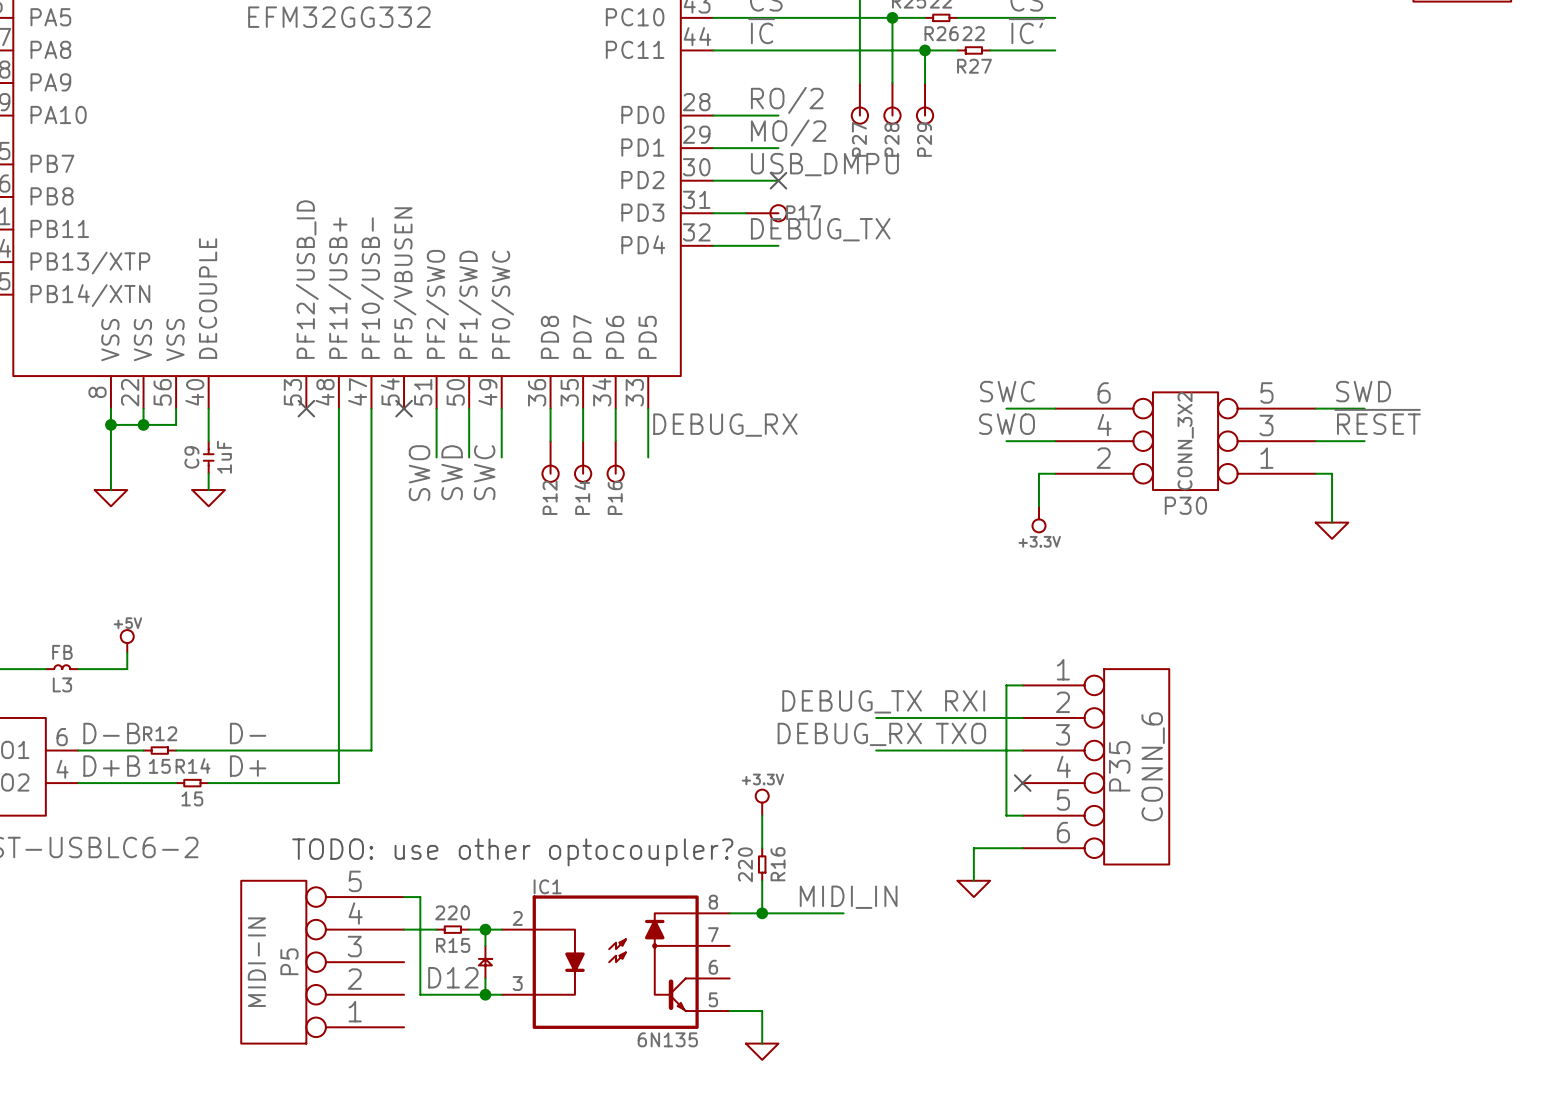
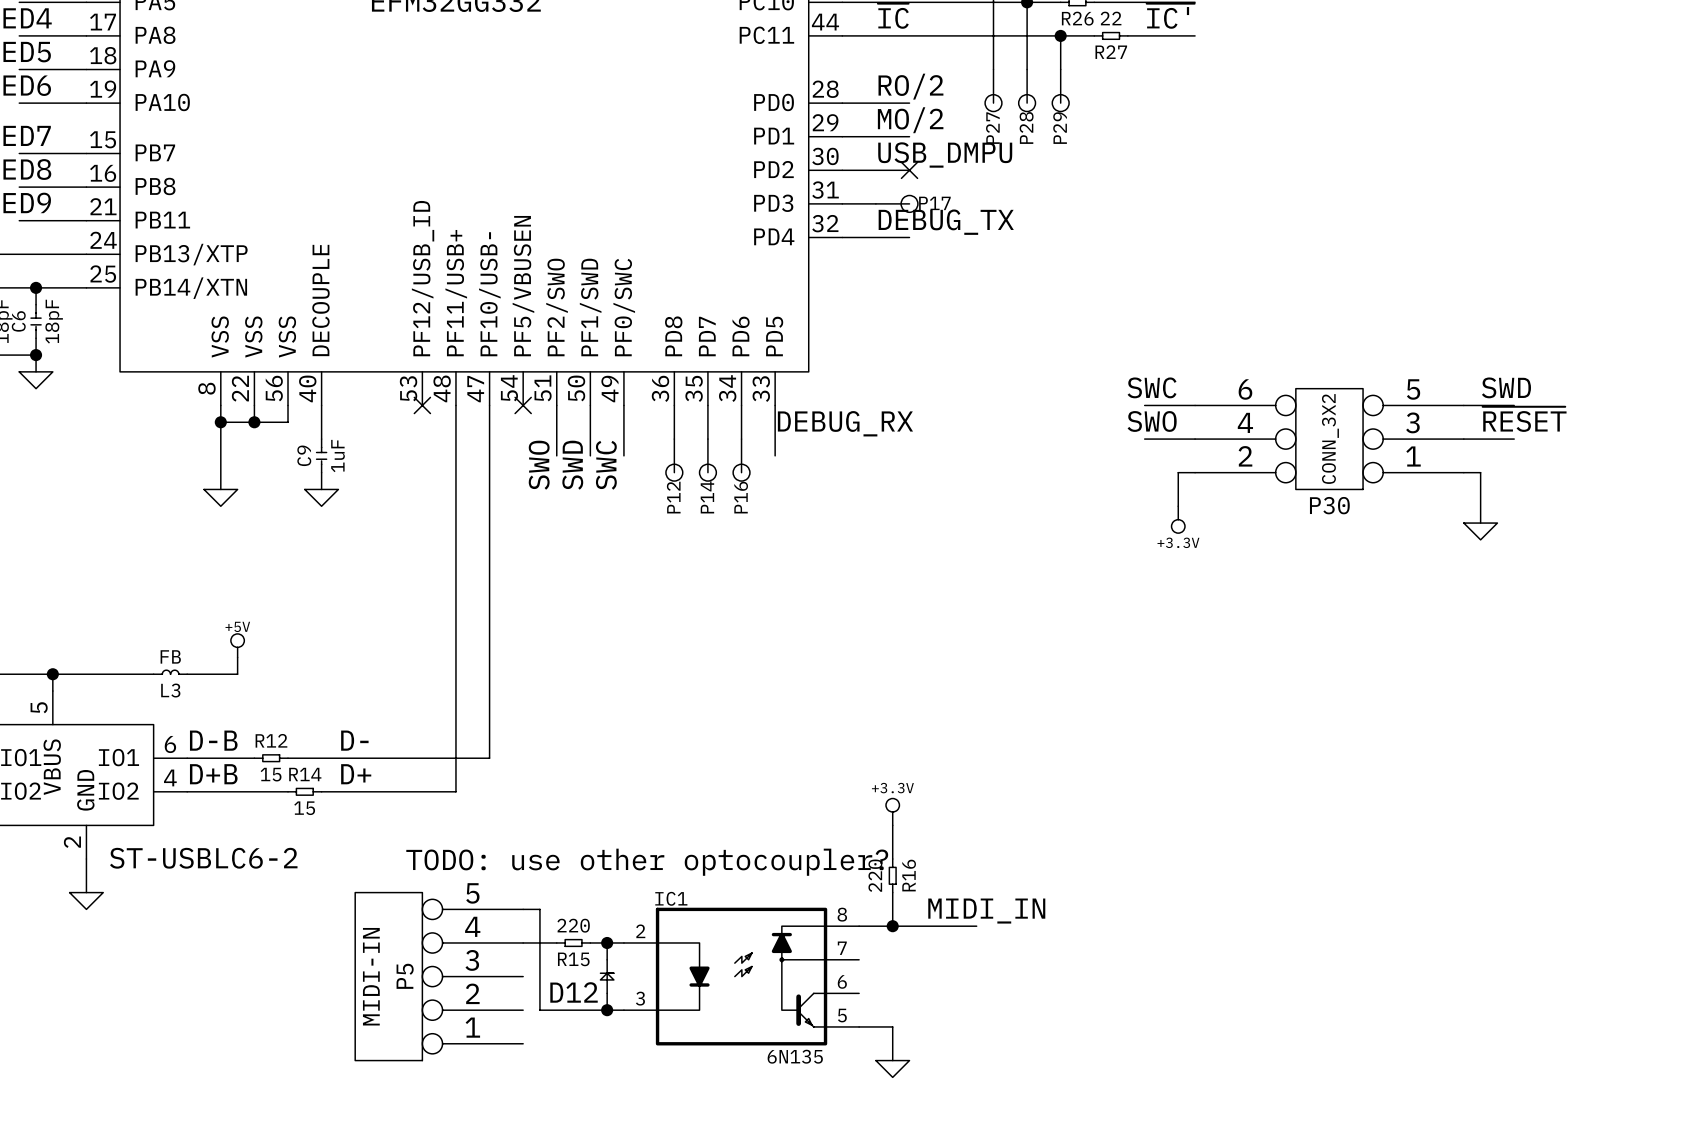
wire: (1022, 685) (1006, 685) (1006, 815) (1022, 815) -> none
label: RXI (965, 700) -> none
label: DEBUG_TX (852, 701) -> none
wire: (876, 717) (1022, 717) -> none
label: TXO (960, 733) -> none
label: DEBUG_RX (849, 734) -> none
wire: (876, 750) (1022, 750) -> none
P35: CONN_6 (1095, 766) -> none
no-connect mark: (1022, 783) -> none
wire: (1022, 848) (973, 848) (973, 880) -> none
power symbol: (973, 888) -> none

